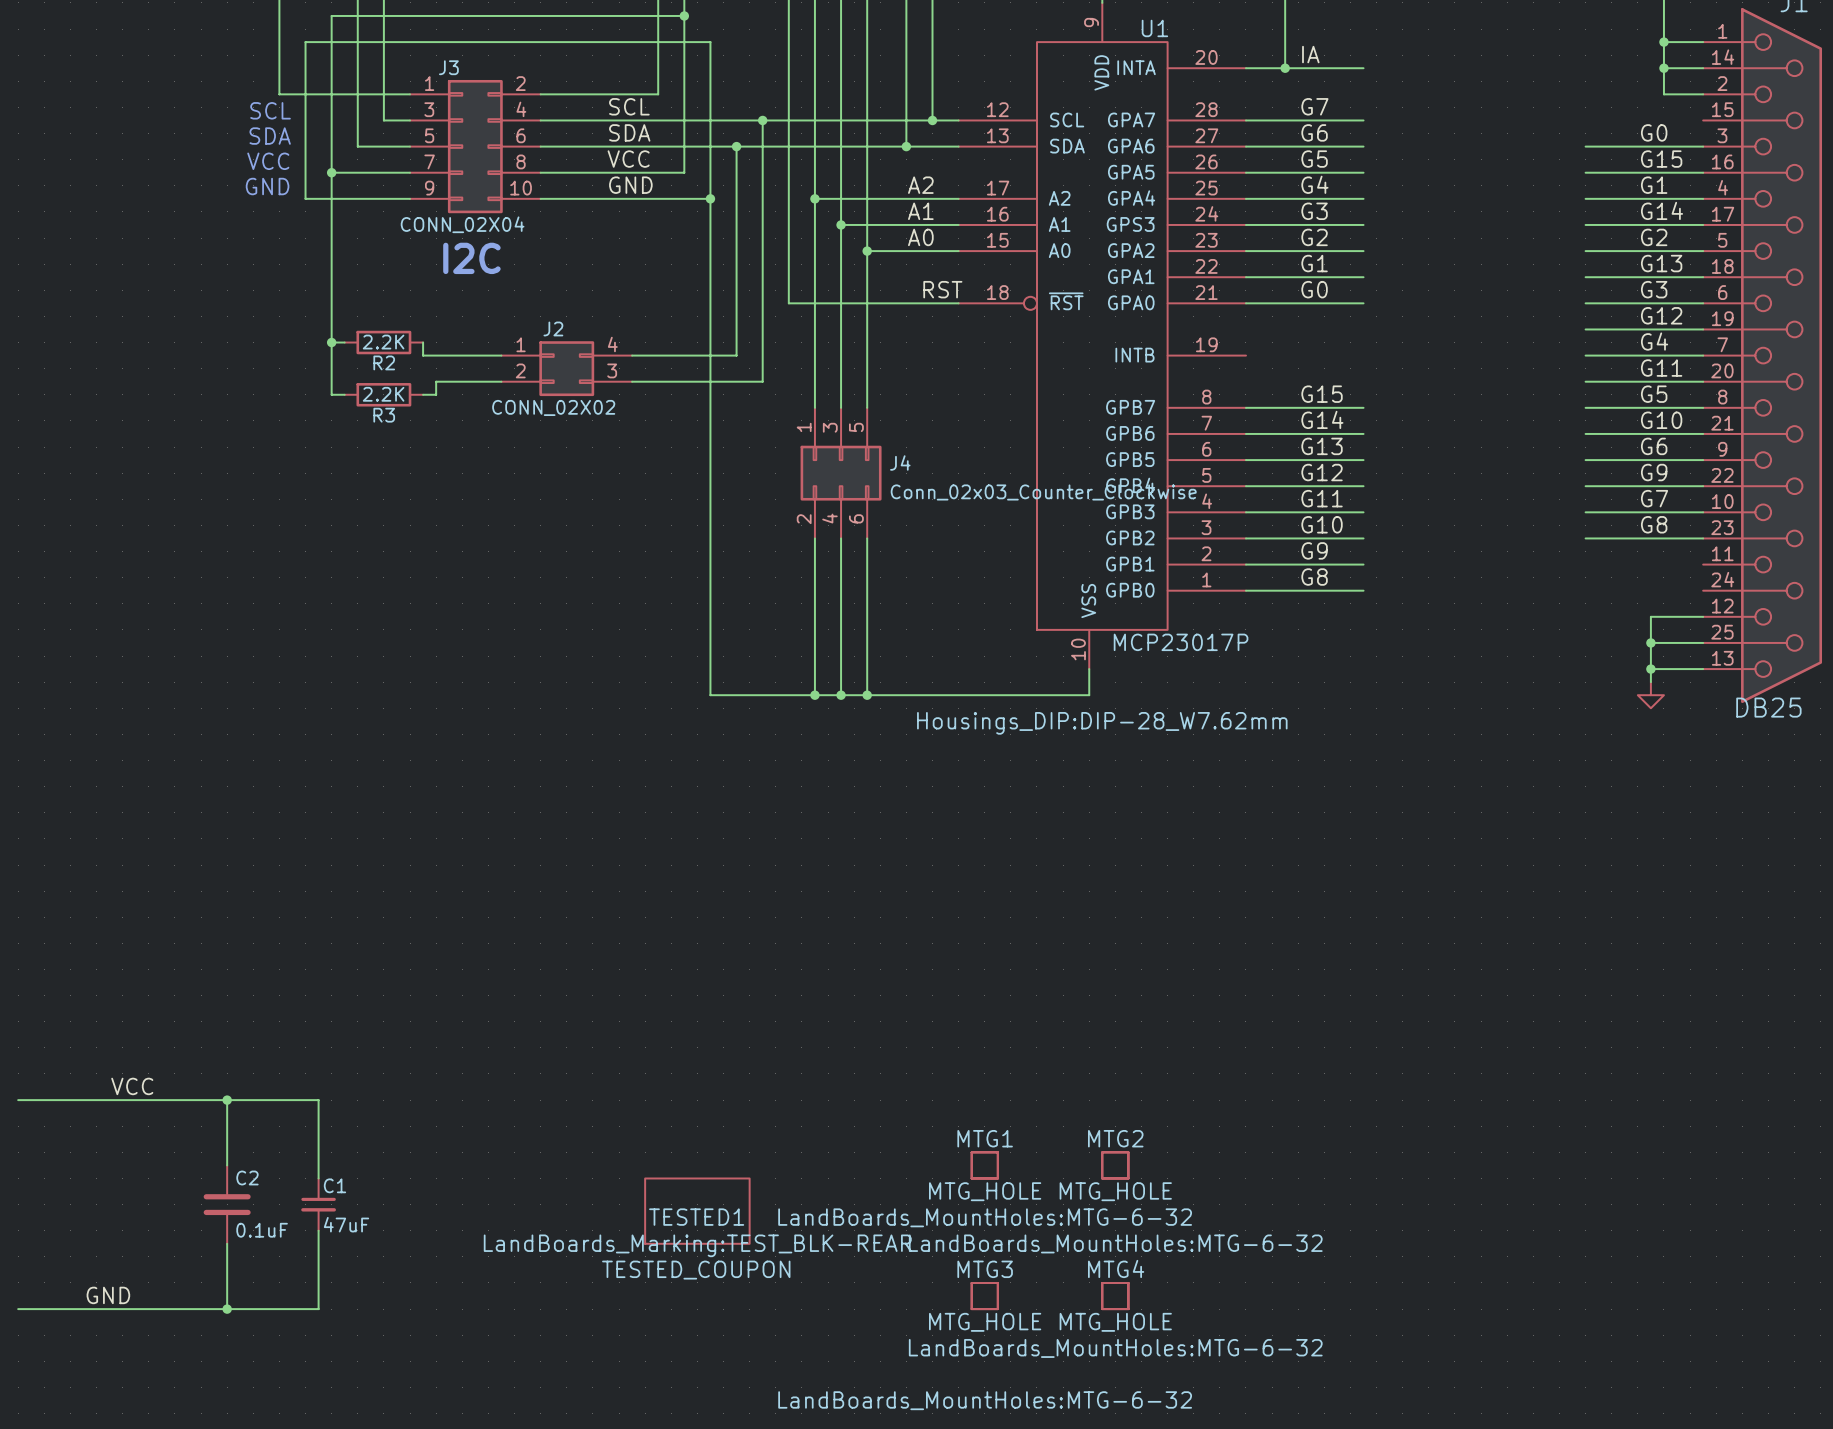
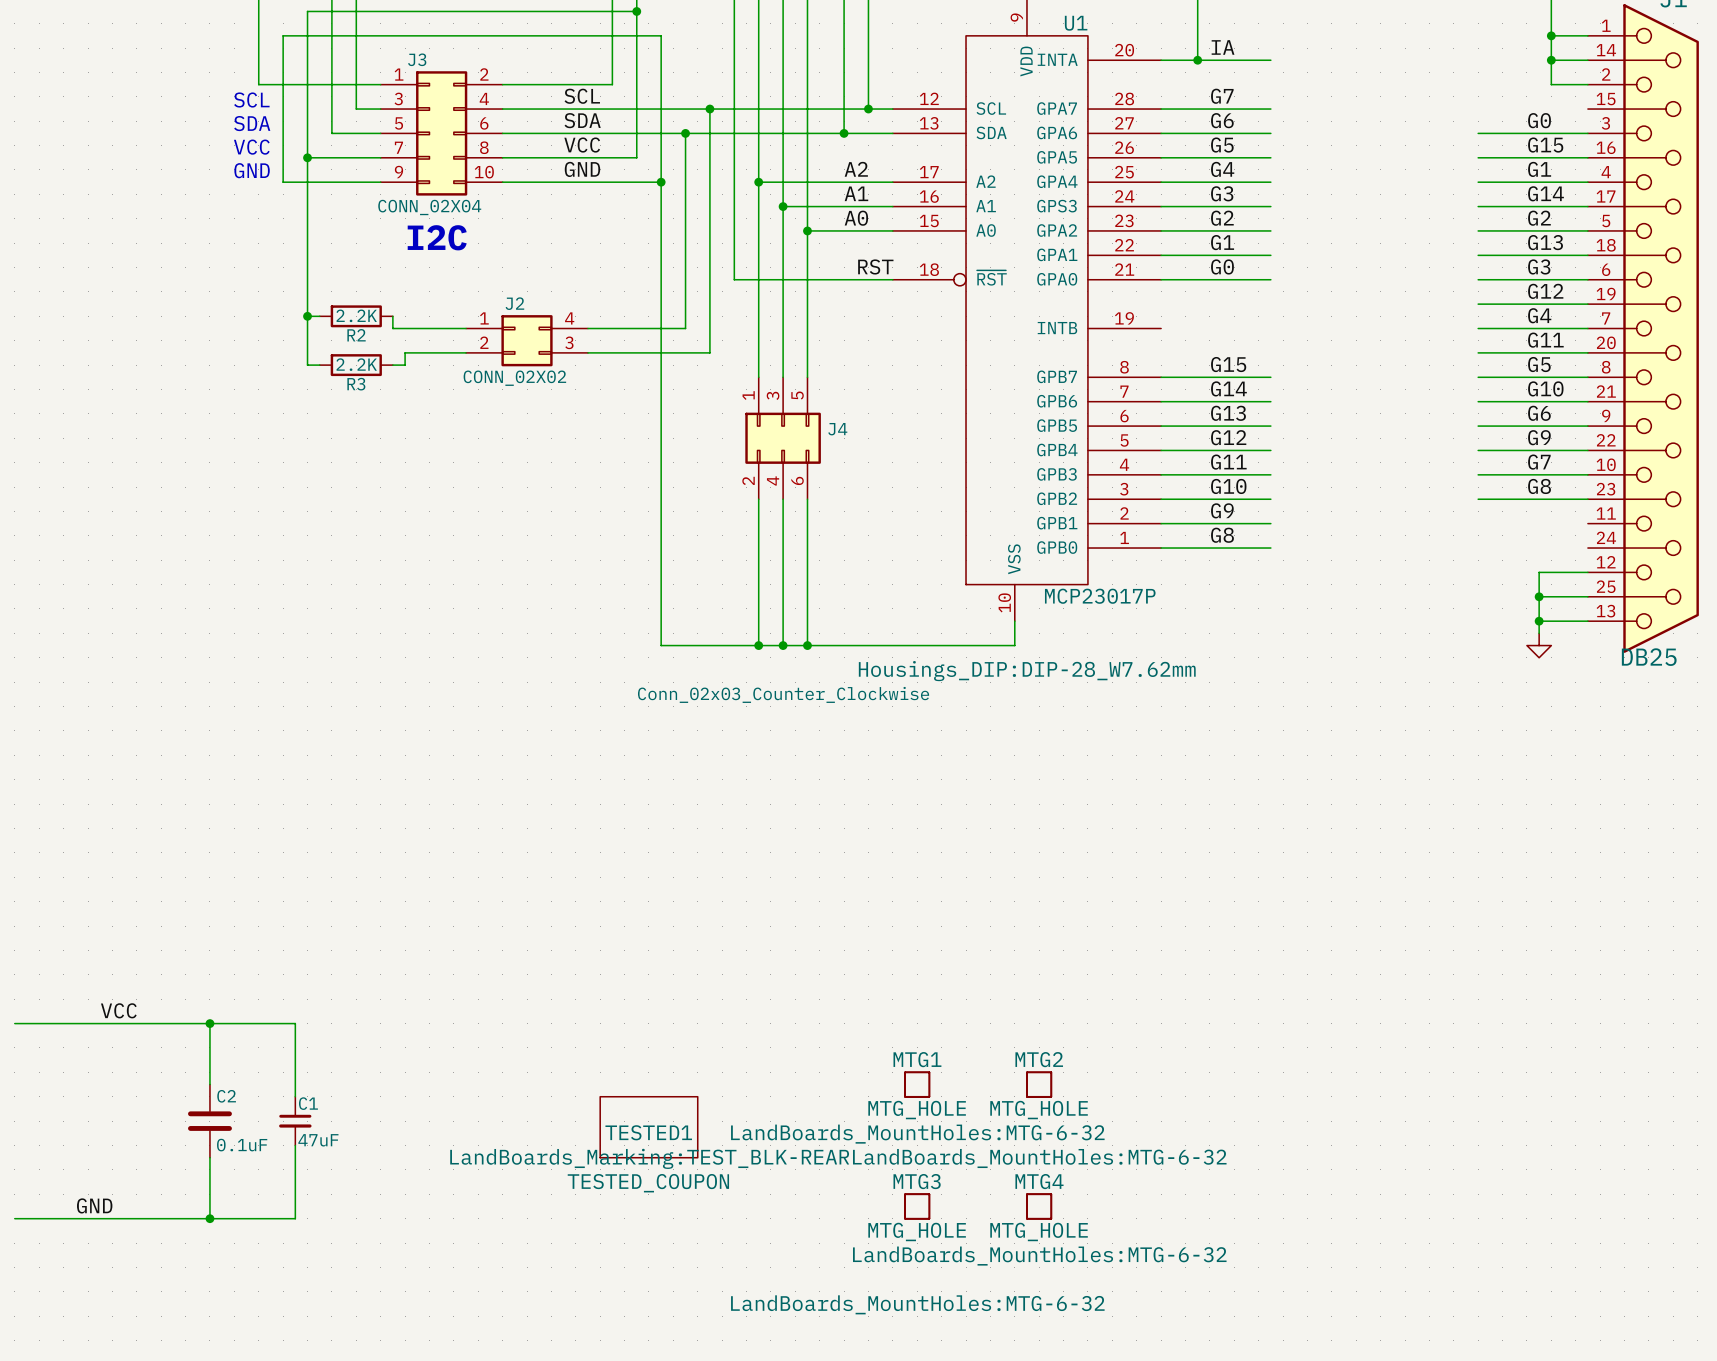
J4 value position: Conn_02x03_Counter_Clockwise (1043, 492) -> Conn_02x03_Counter_Clockwise (783, 694)

